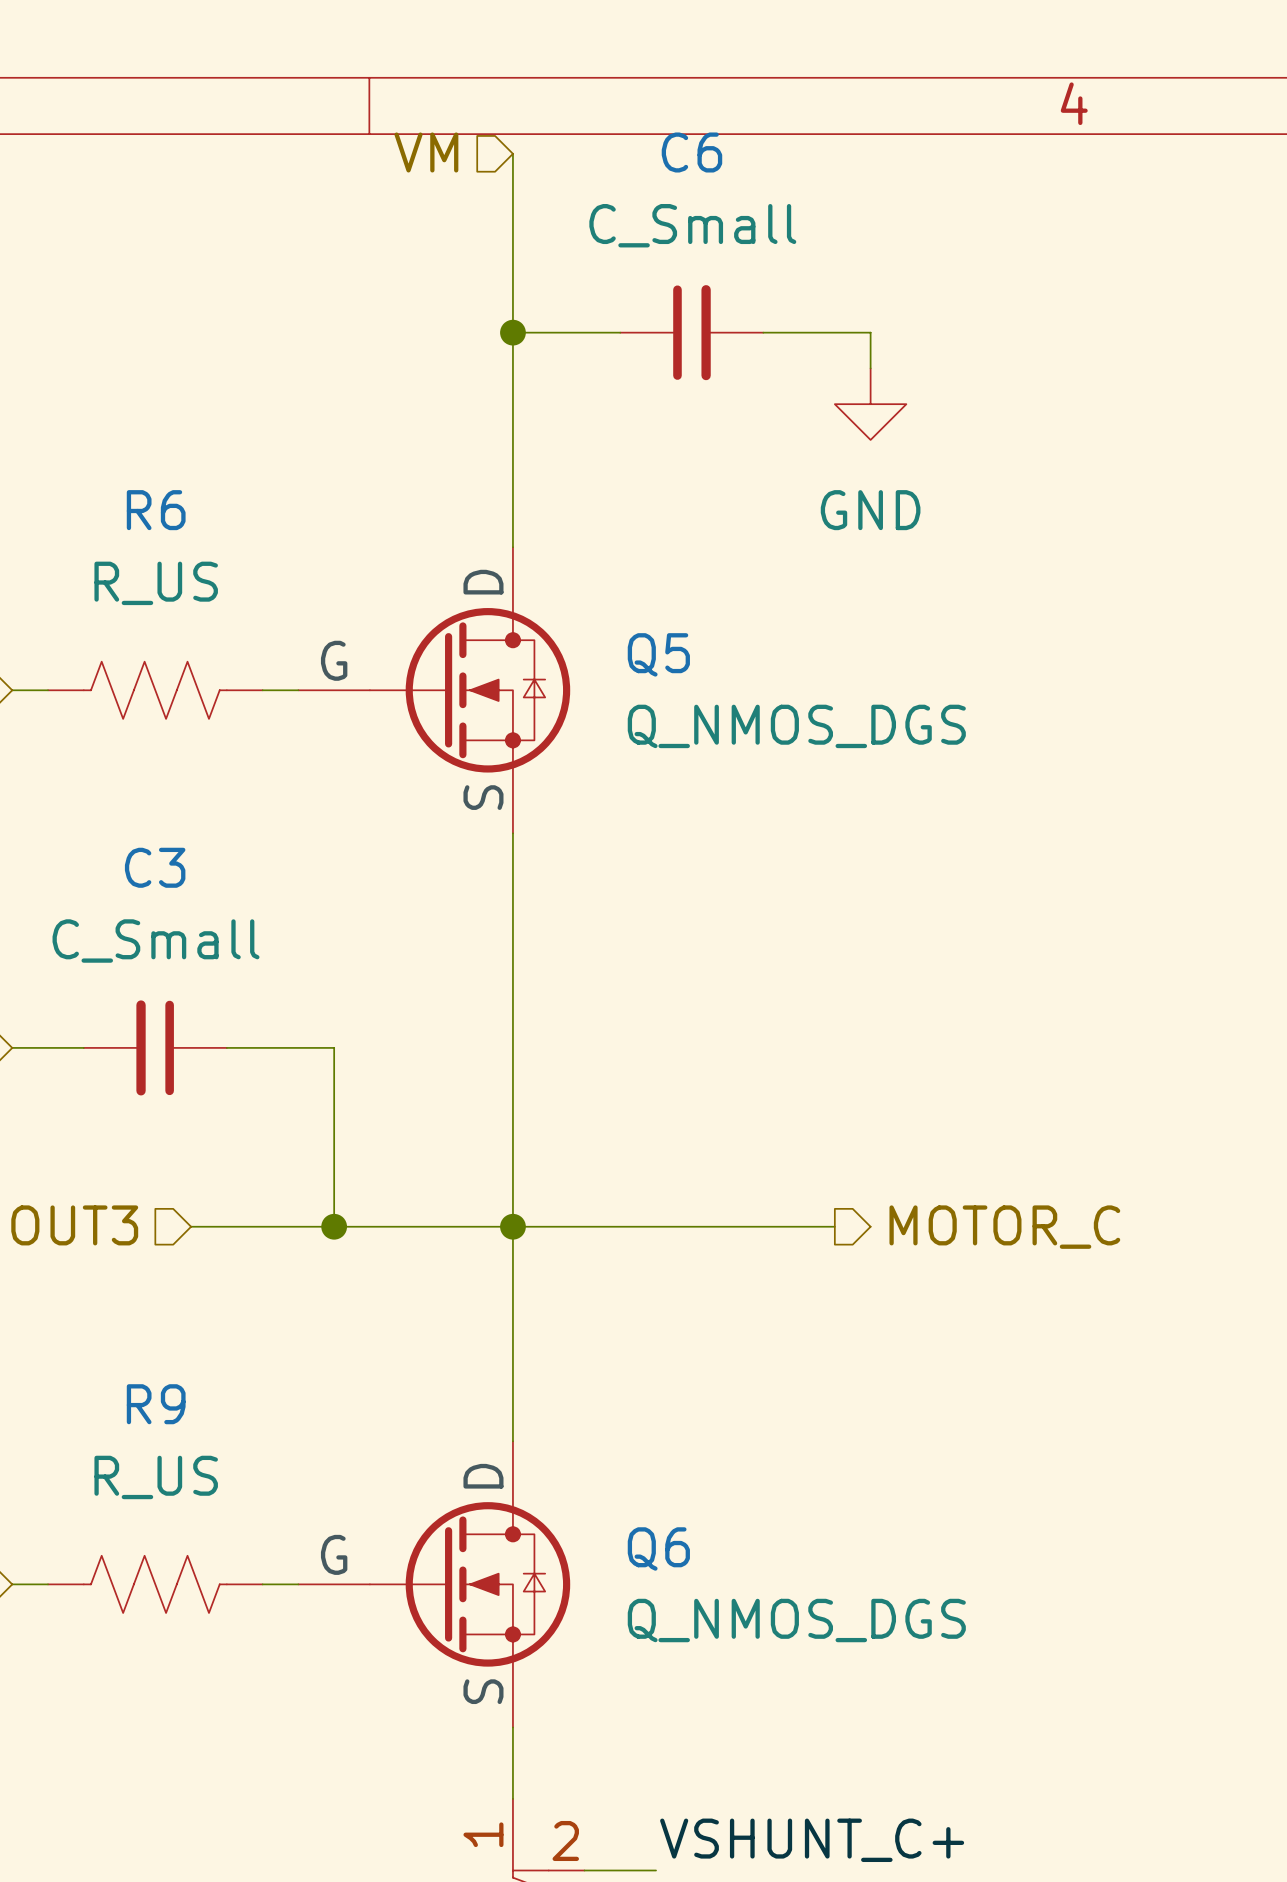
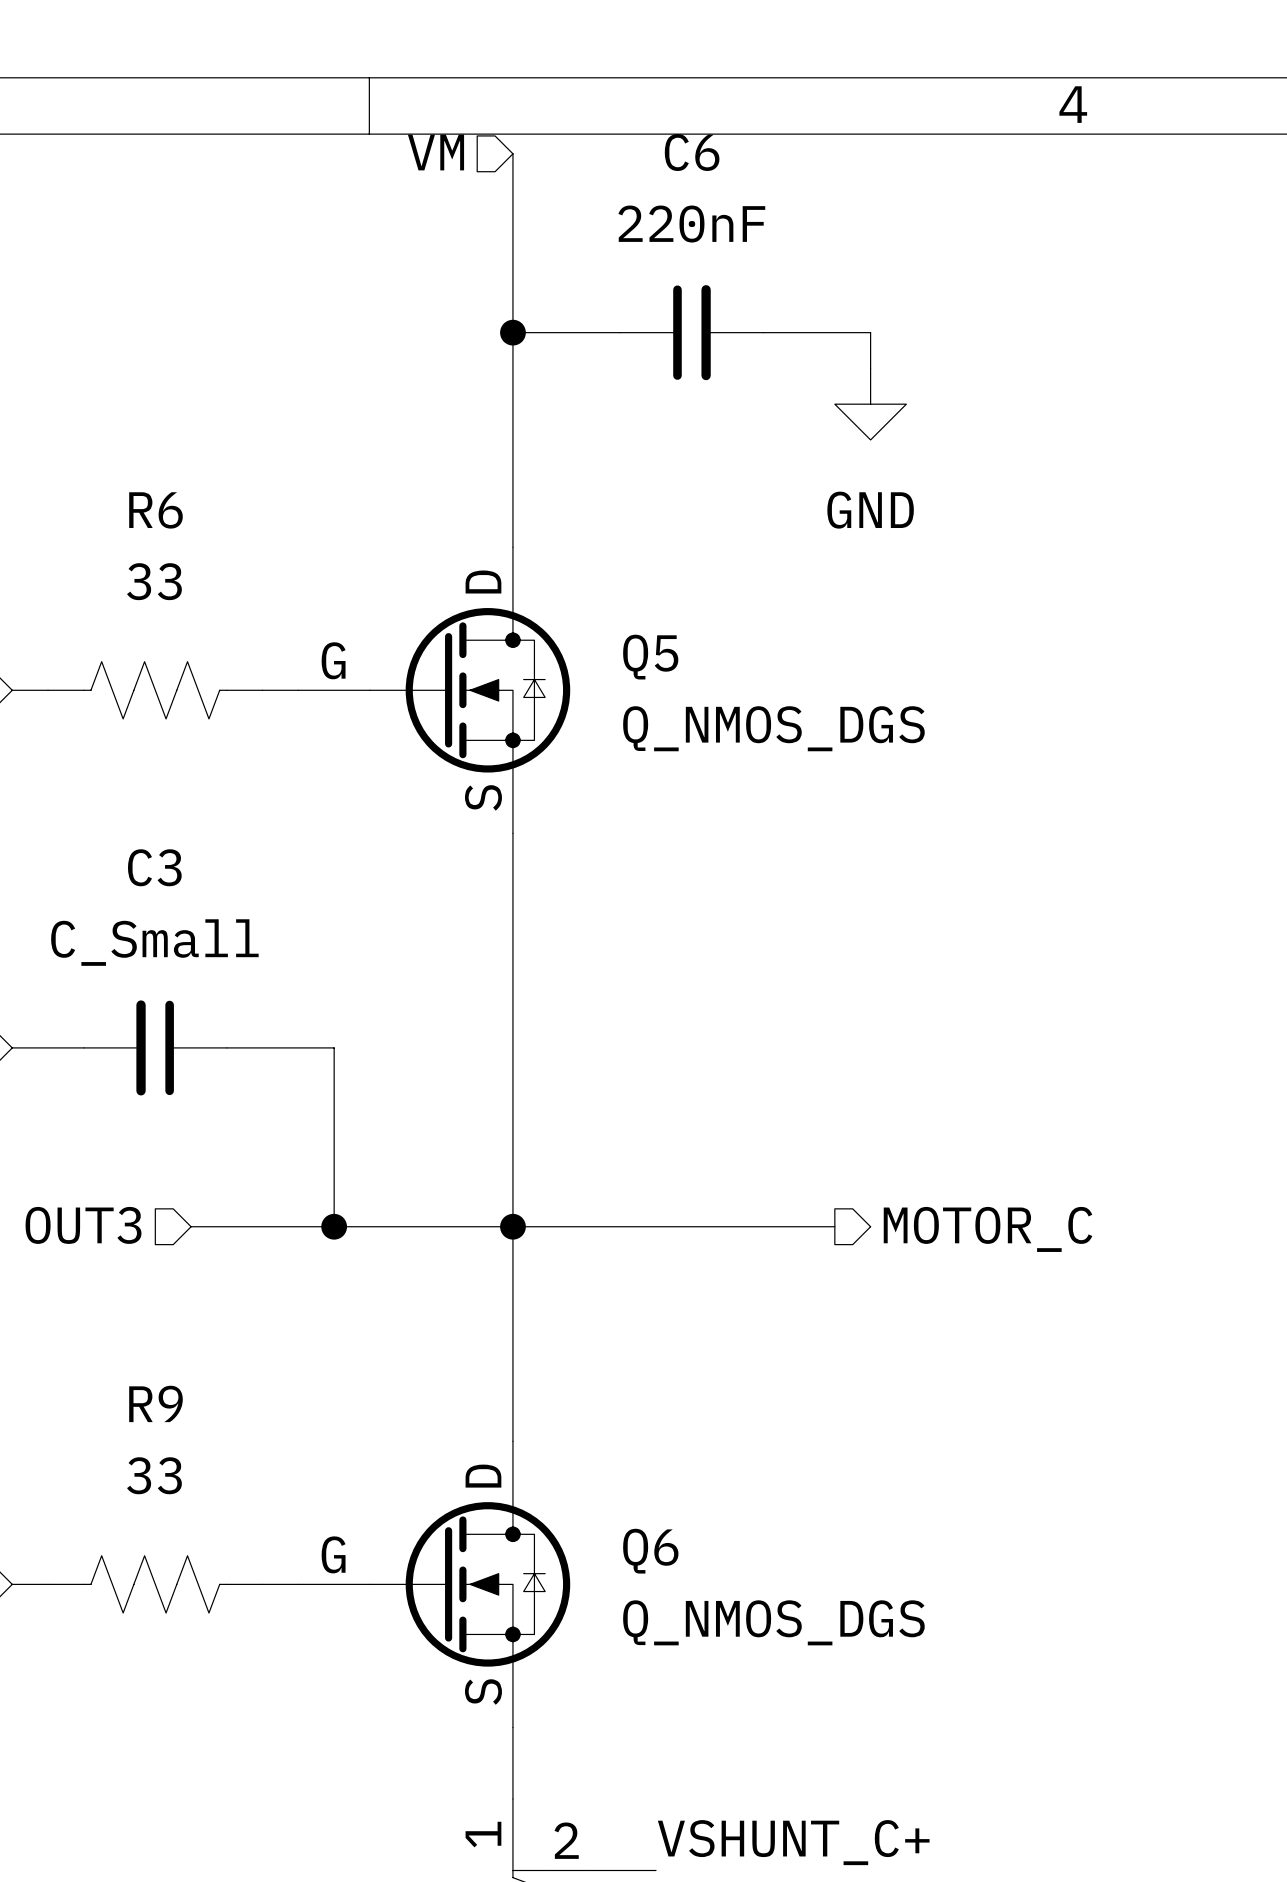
C6 value: C_Small (692, 225) -> 220nF (691, 224)
R6 value: R_US (156, 583) -> 33 (154, 581)
R9 value: R_US (156, 1477) -> 33 (154, 1475)

